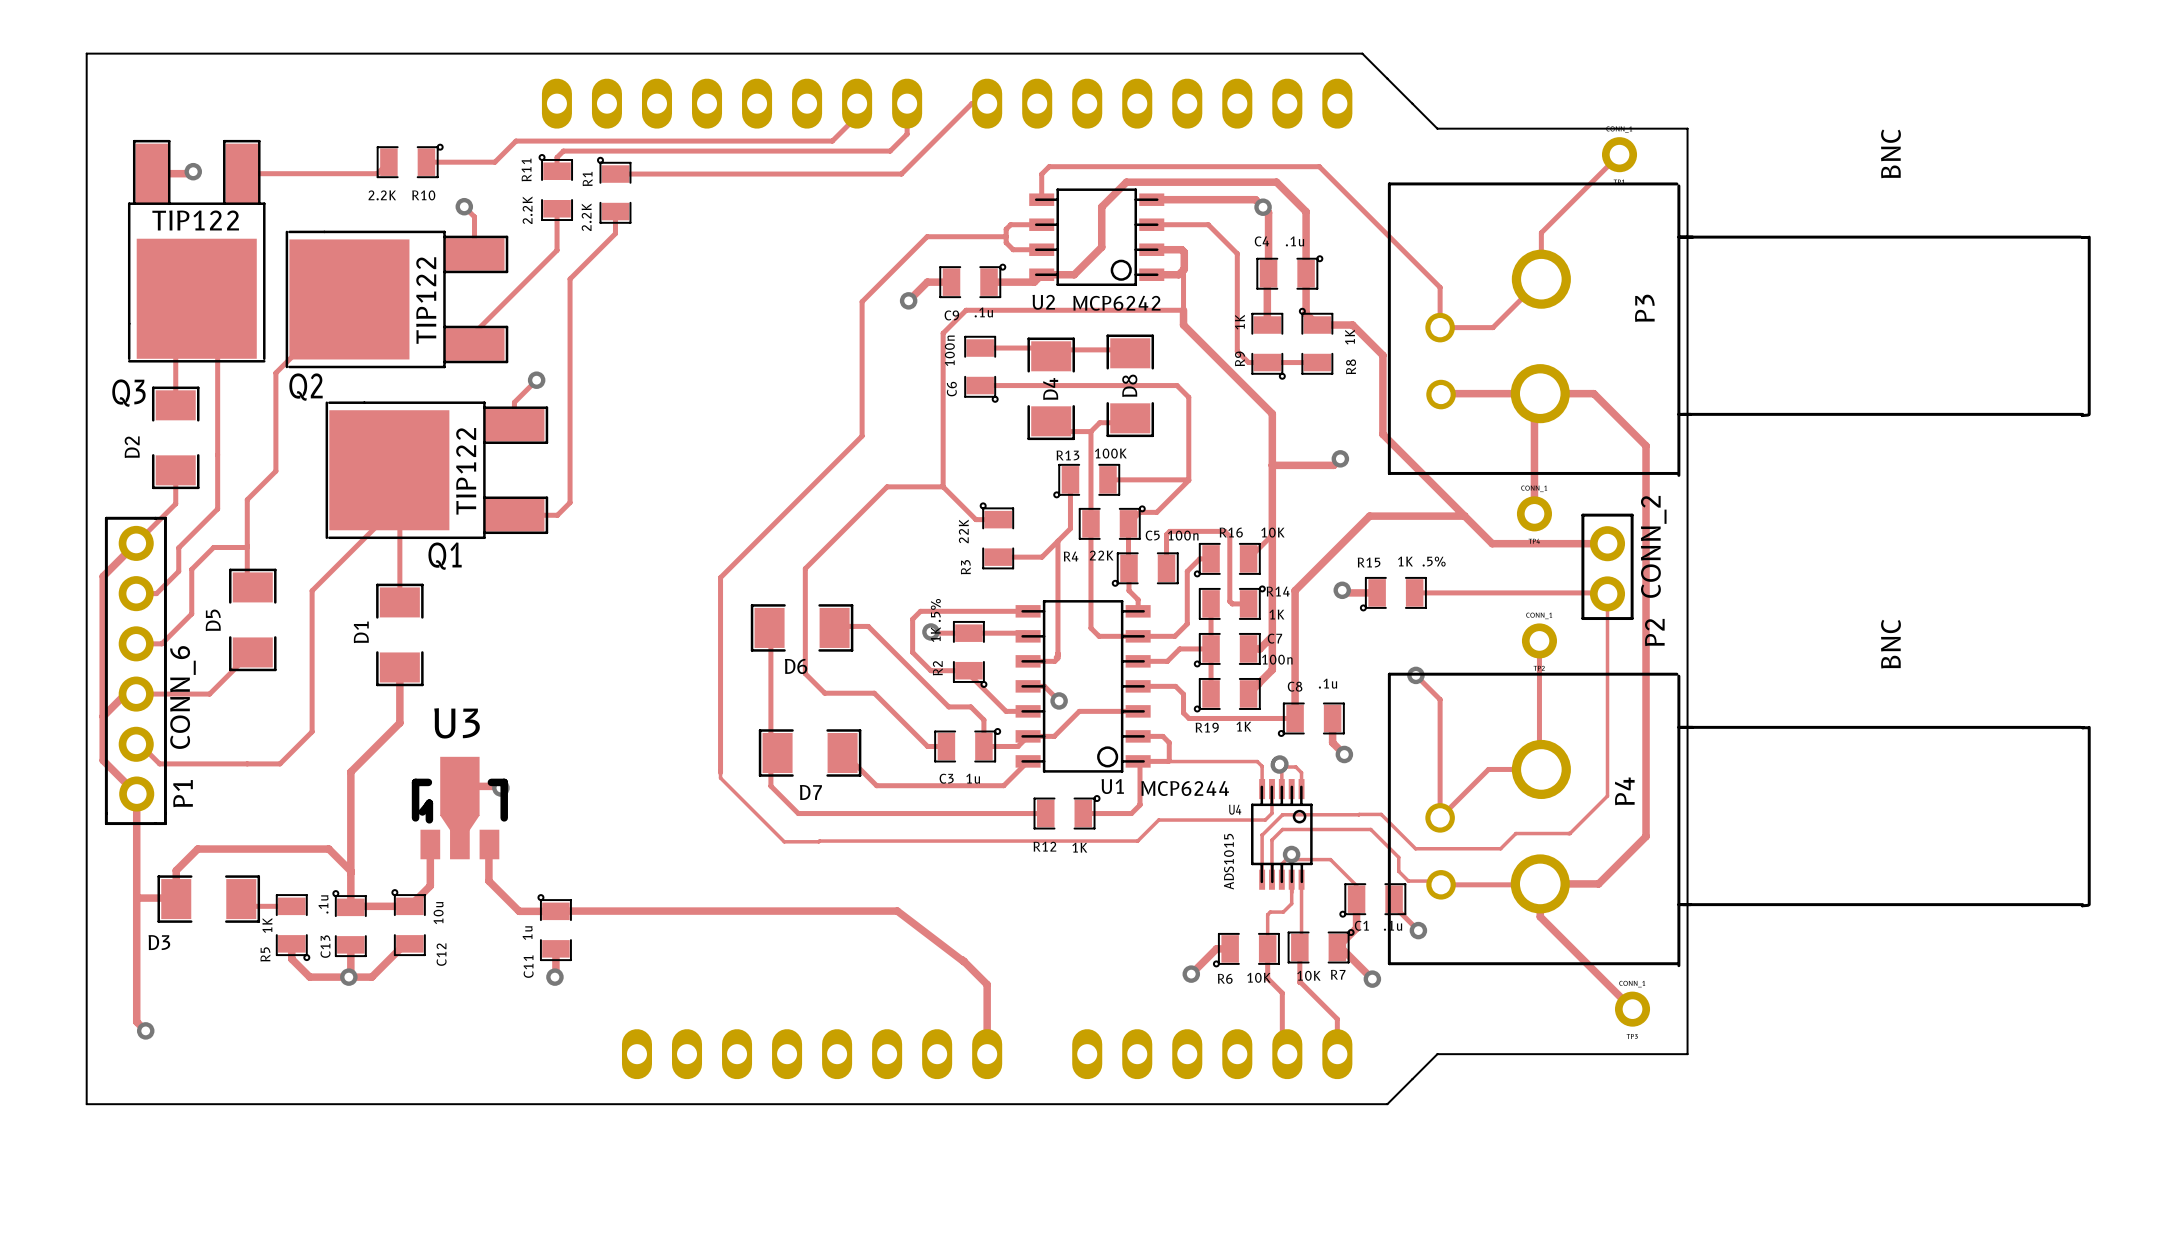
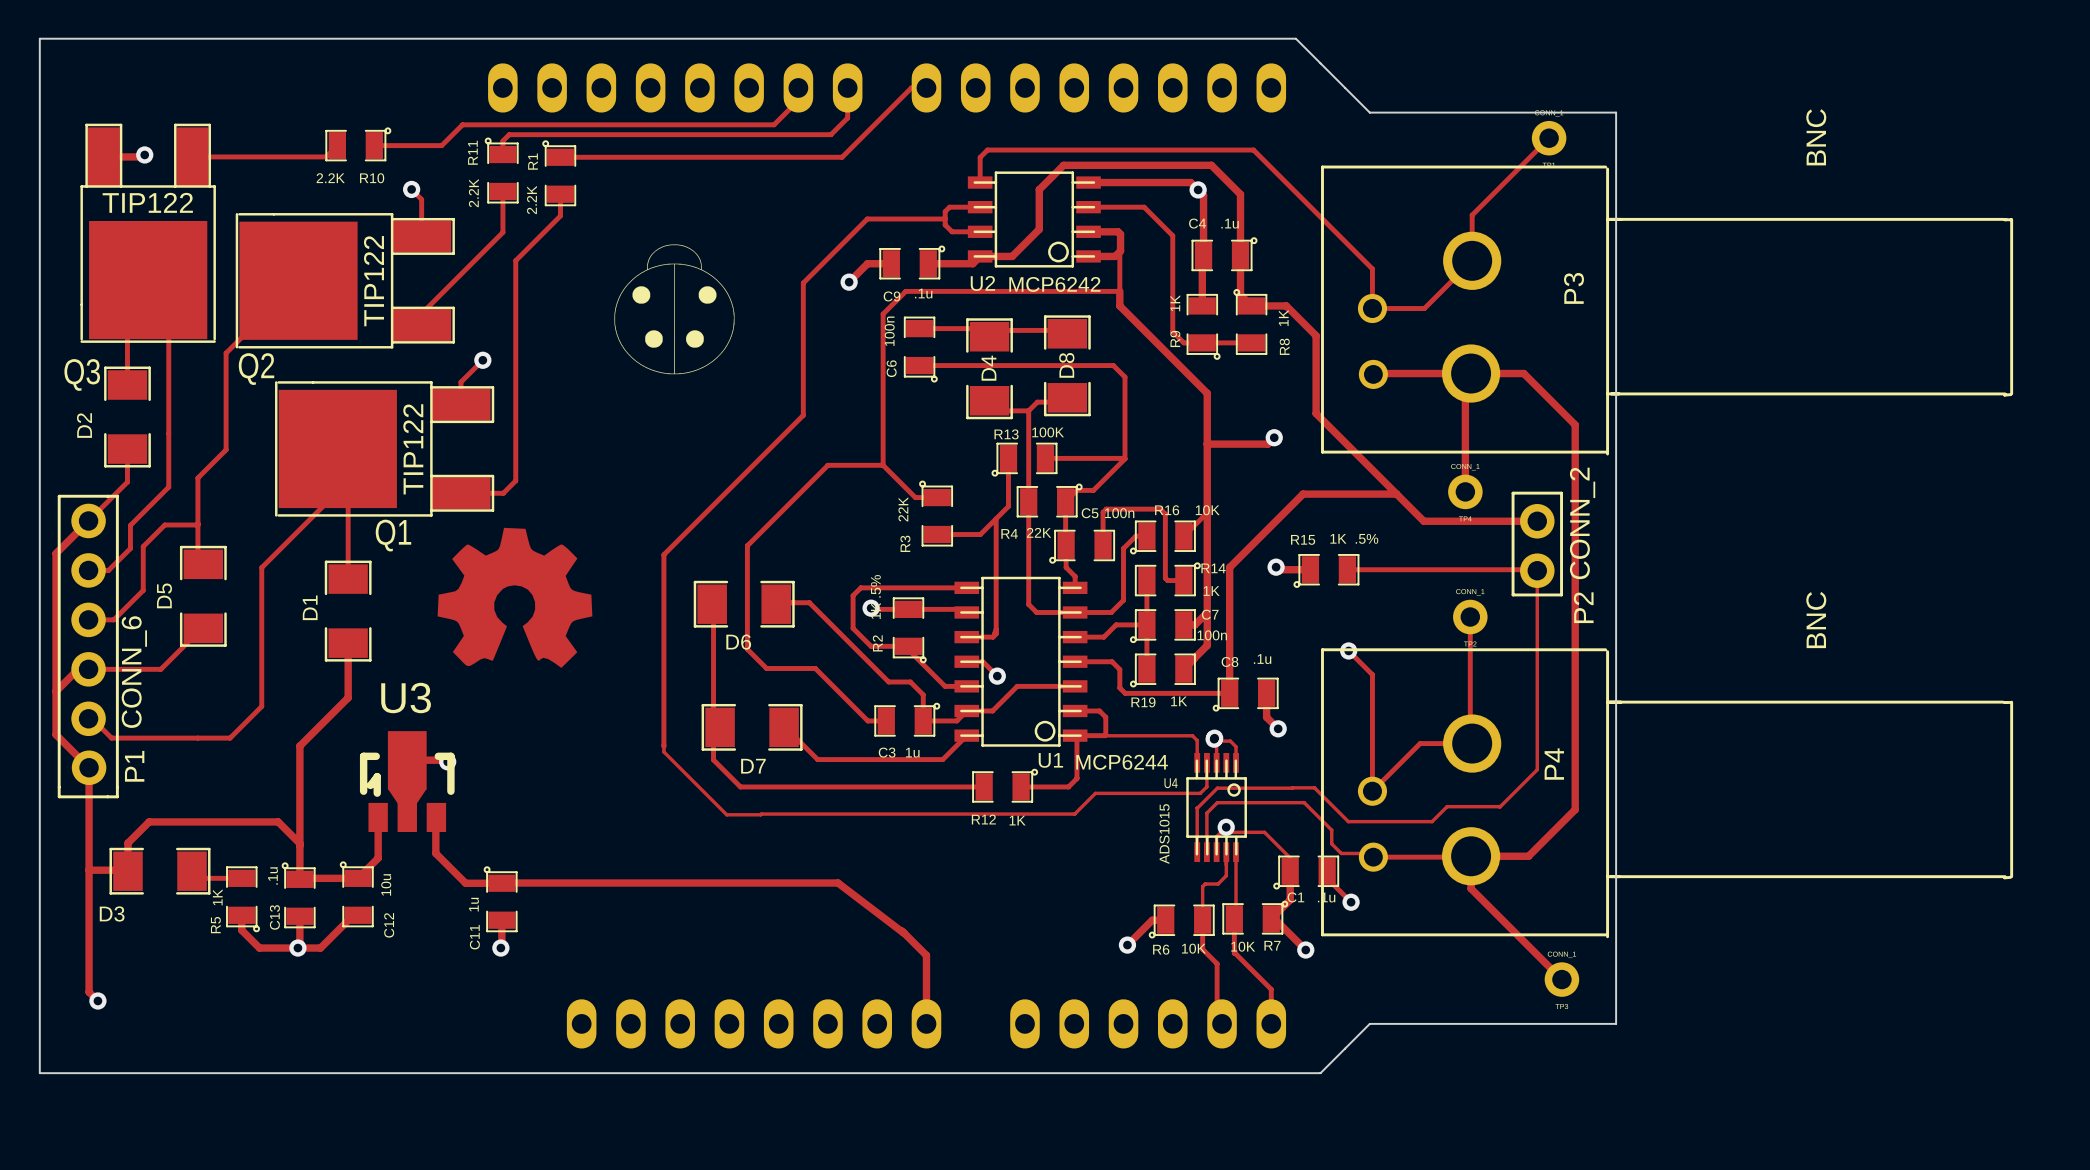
drawing: none -> [614, 244, 735, 375]
drawing: none -> [437, 527, 593, 668]

